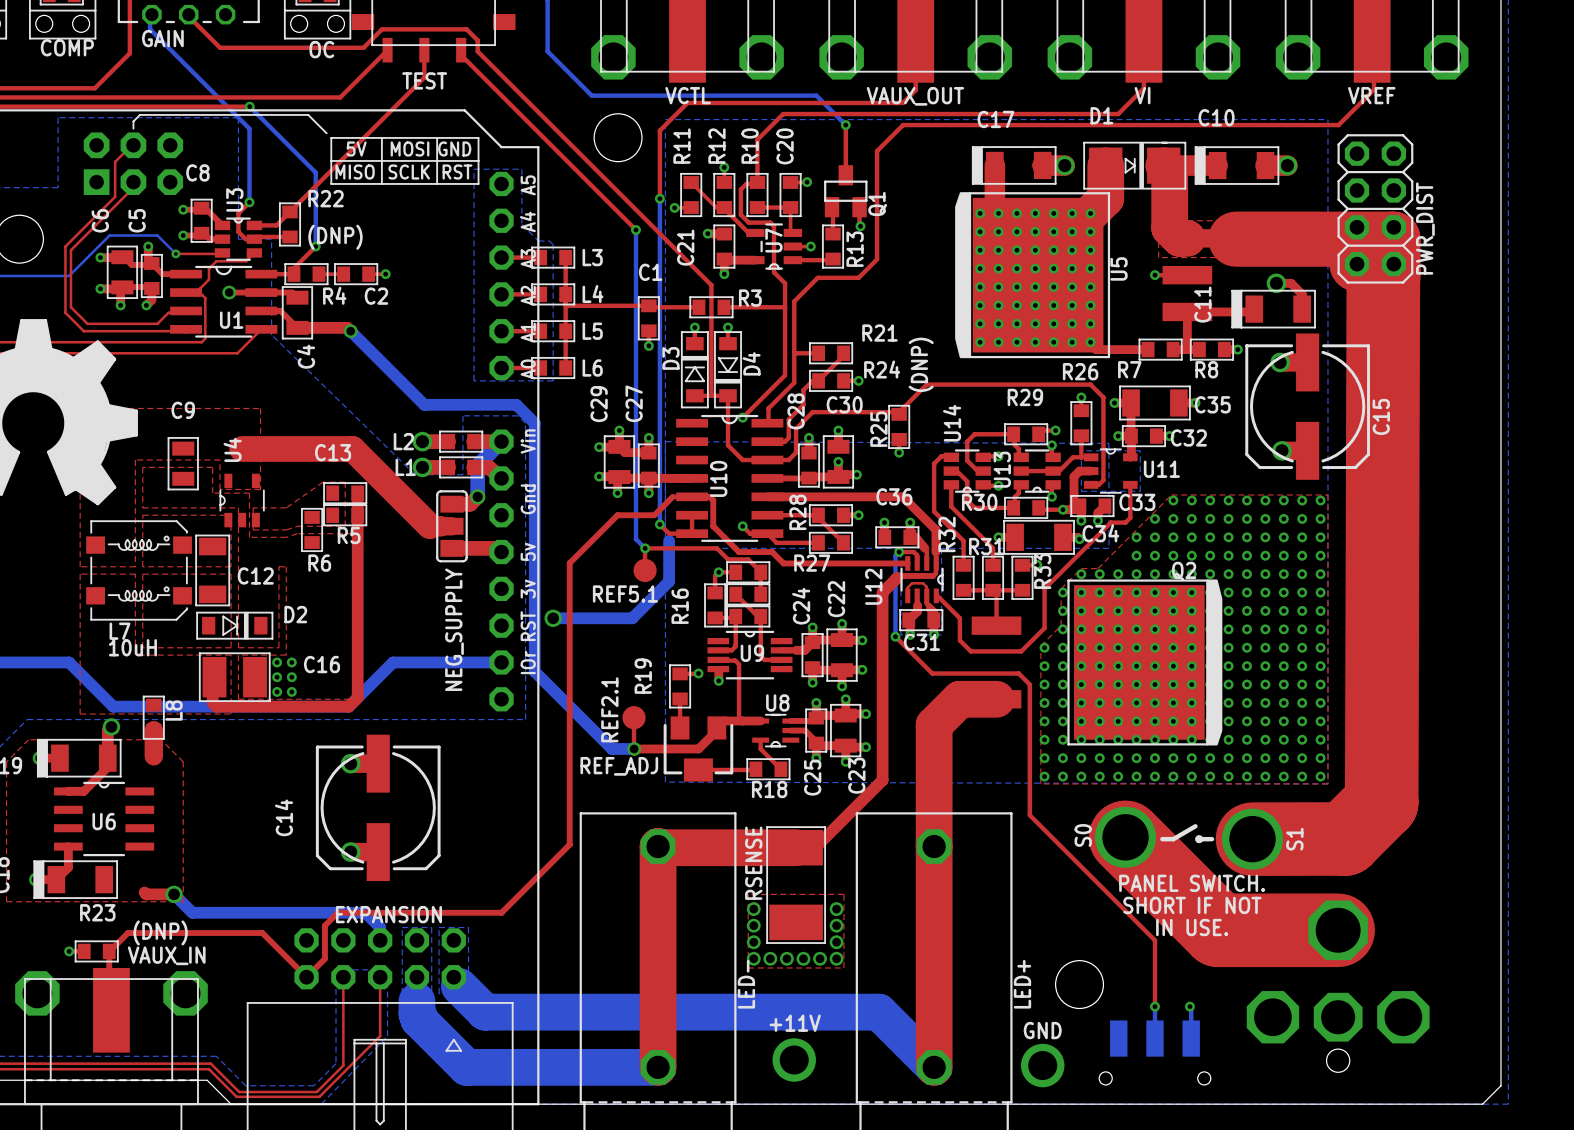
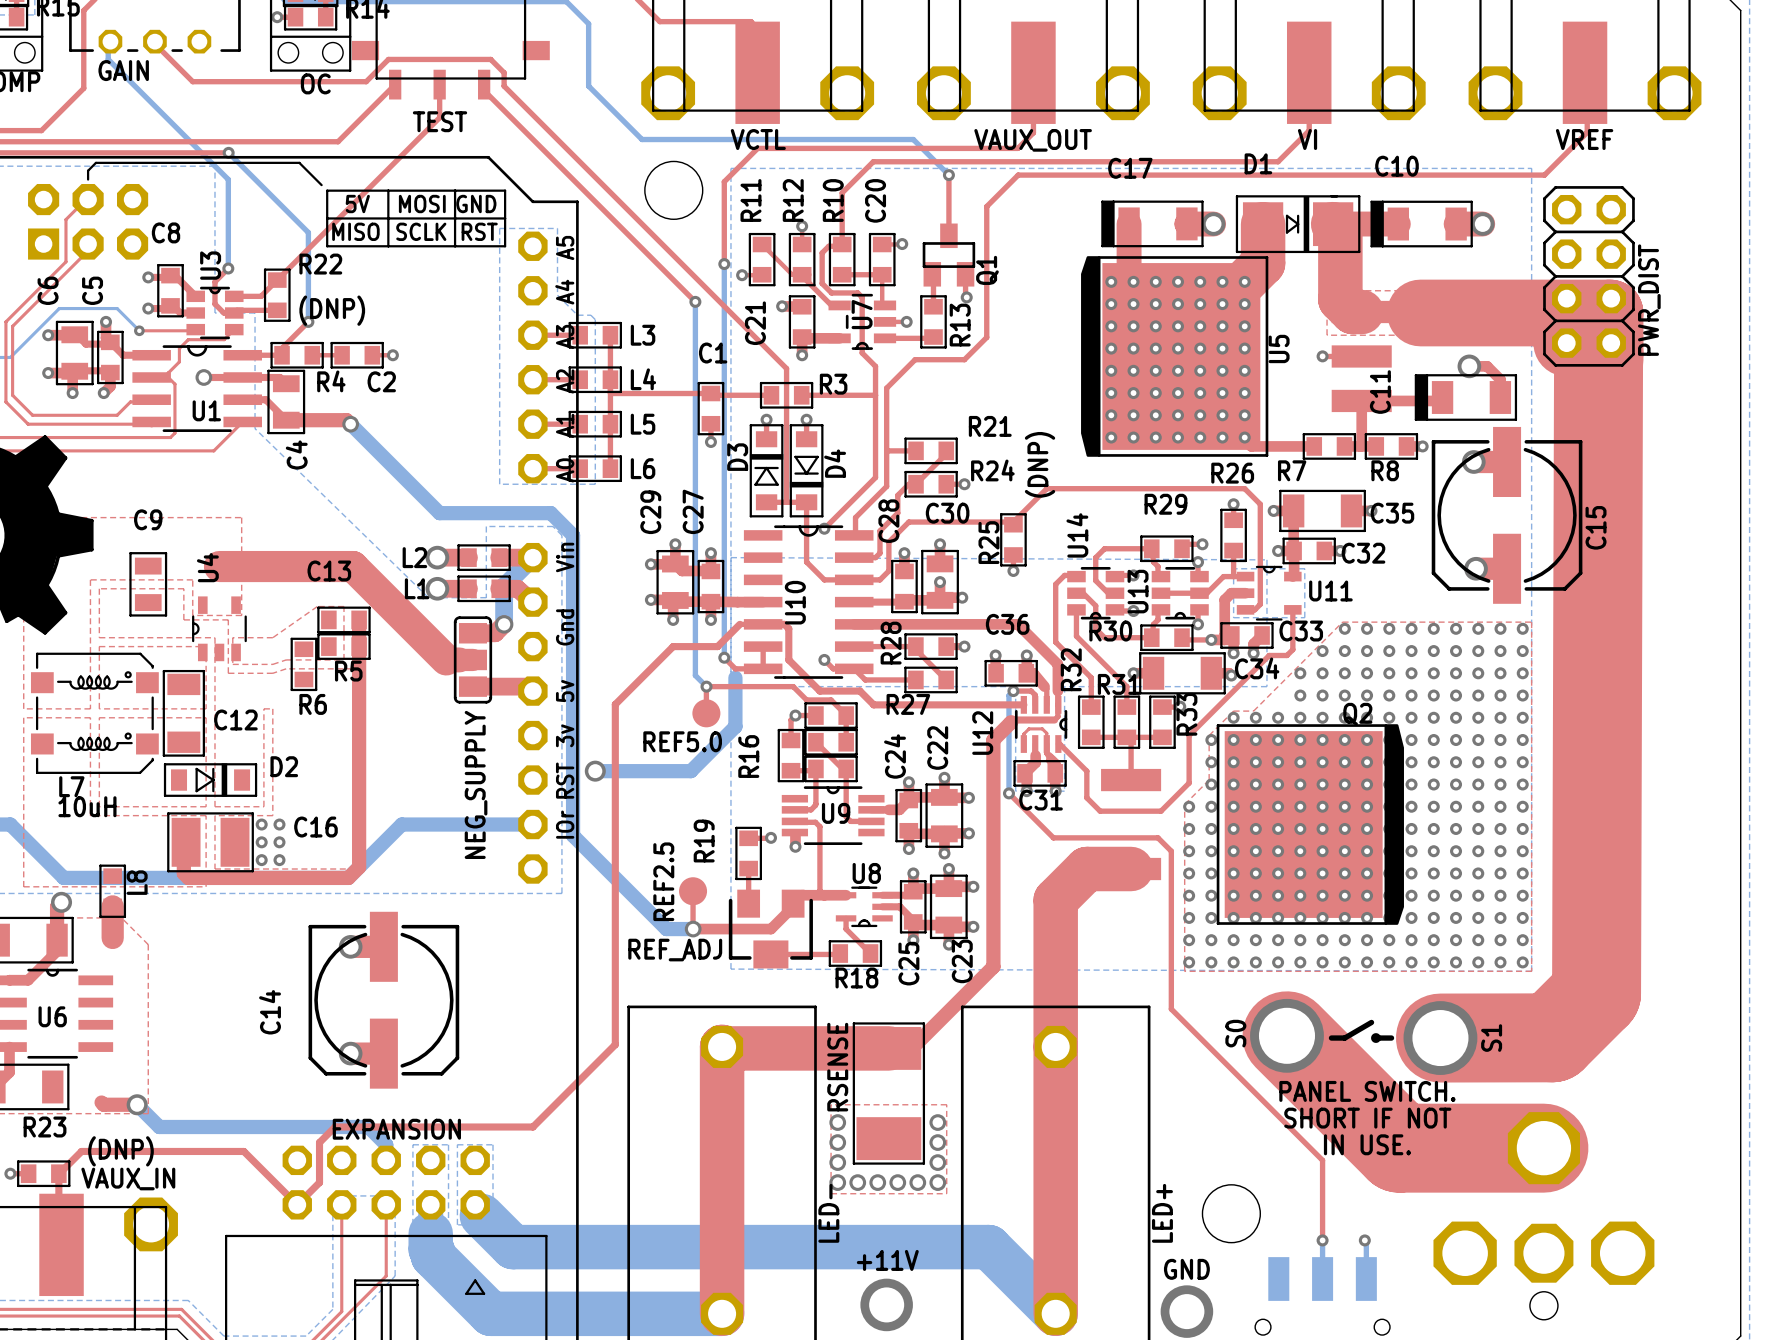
REF5.1 name: REF5.1 (625, 594) -> REF5.0 (682, 741)
REF2.1 name: REF2.1 (609, 709) -> REF2.5 (663, 881)

